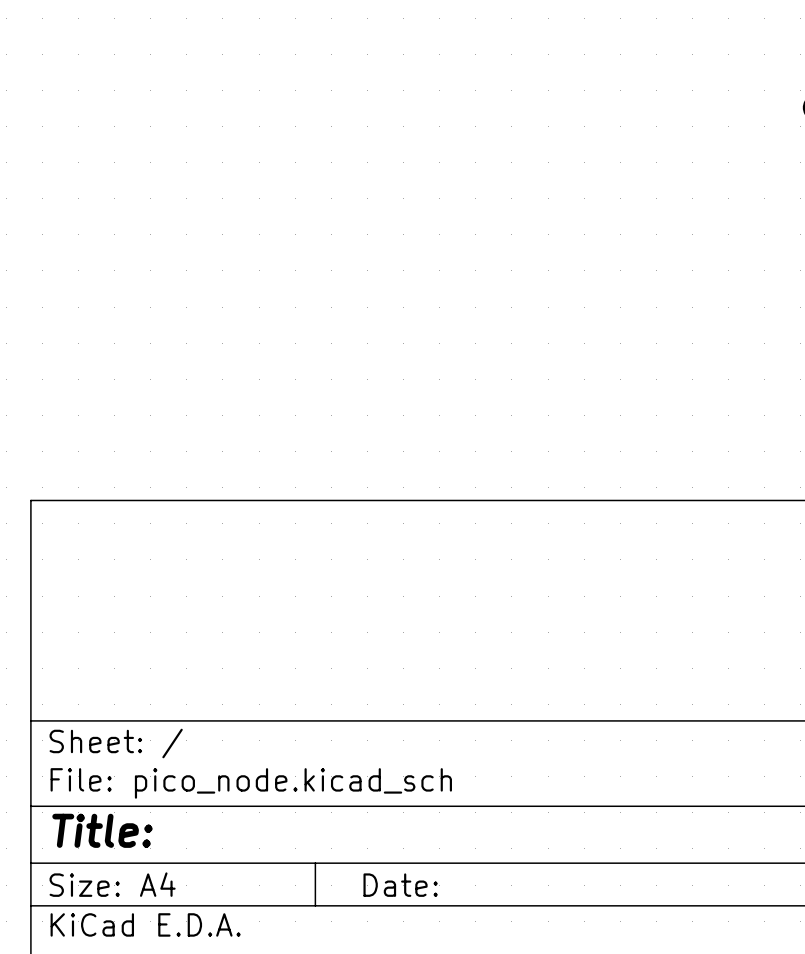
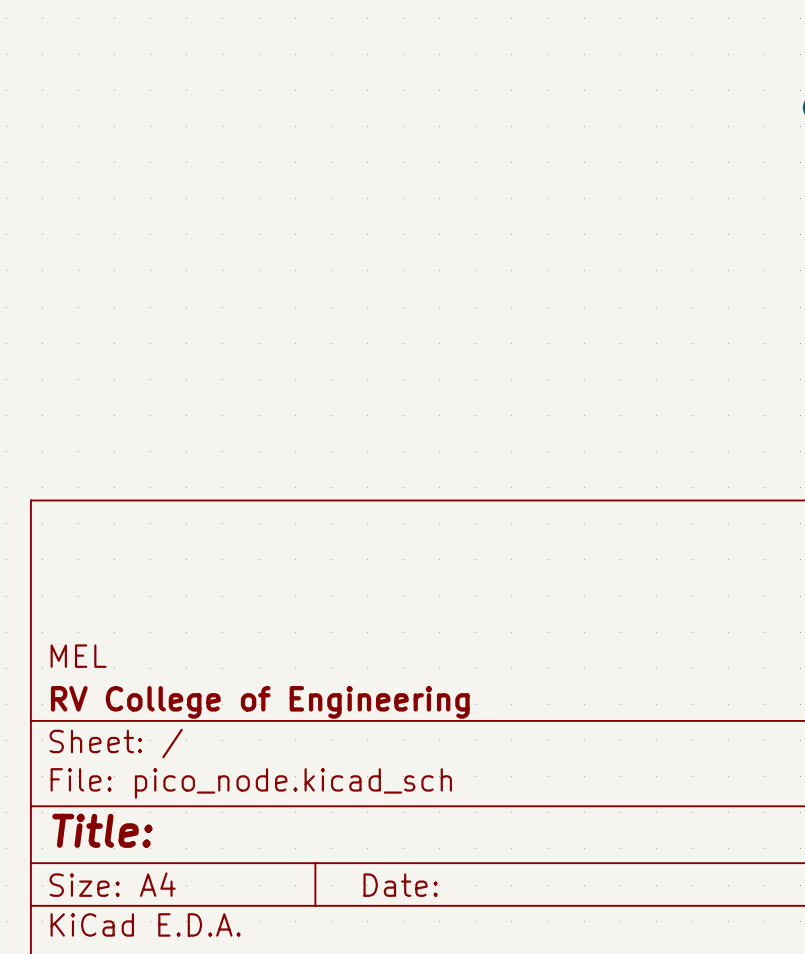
title block: none -> MEL (78, 656)
title block: none -> RV College of Engineering (260, 702)

